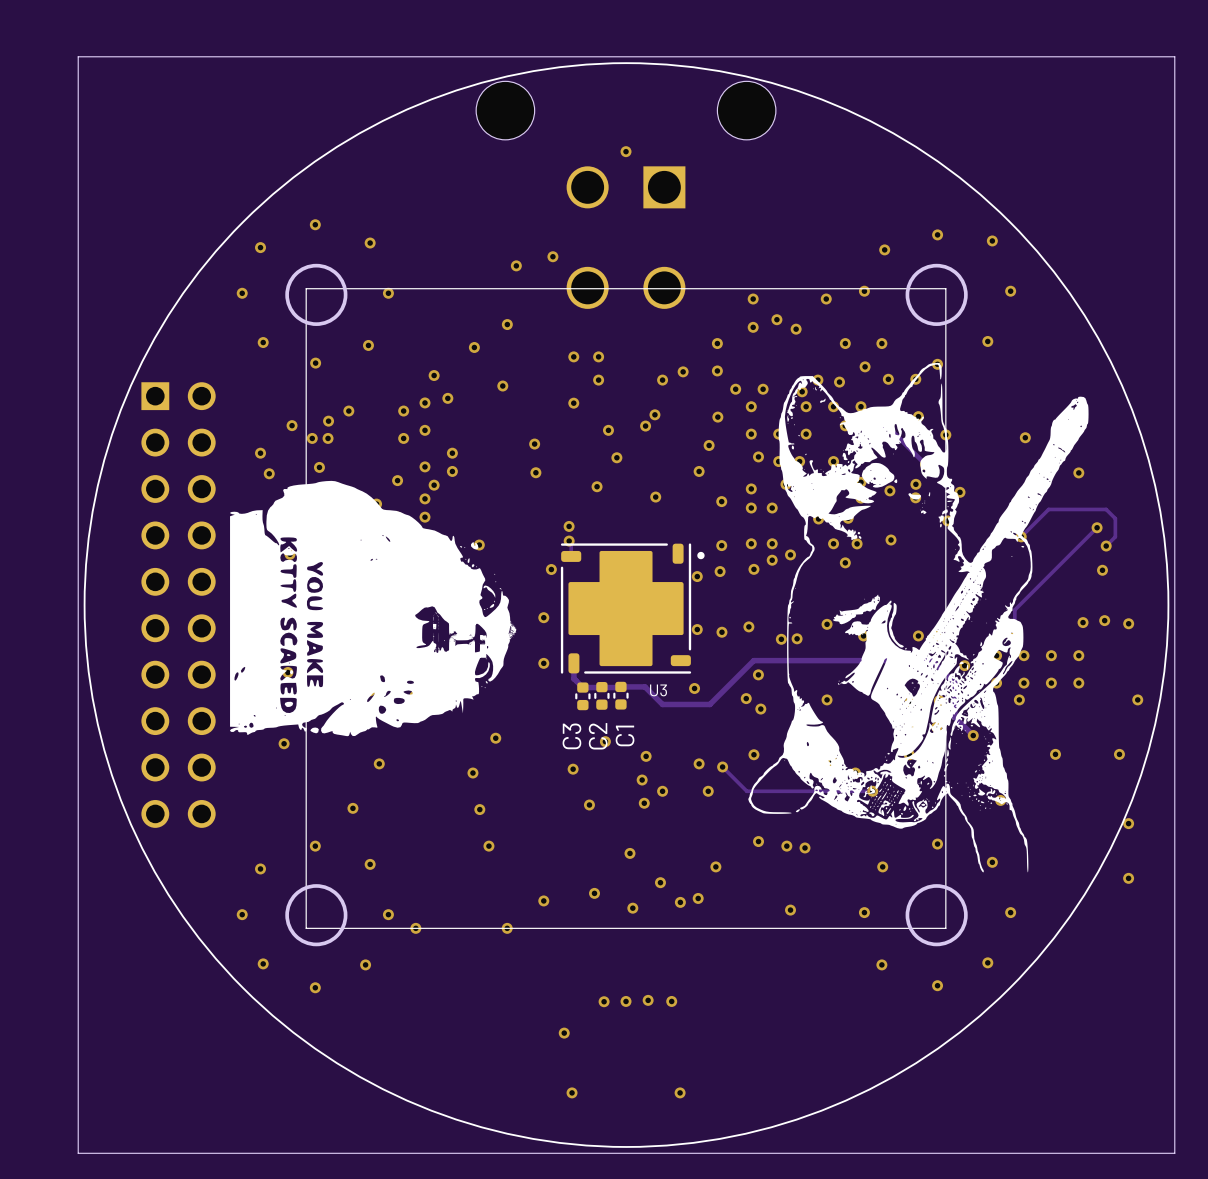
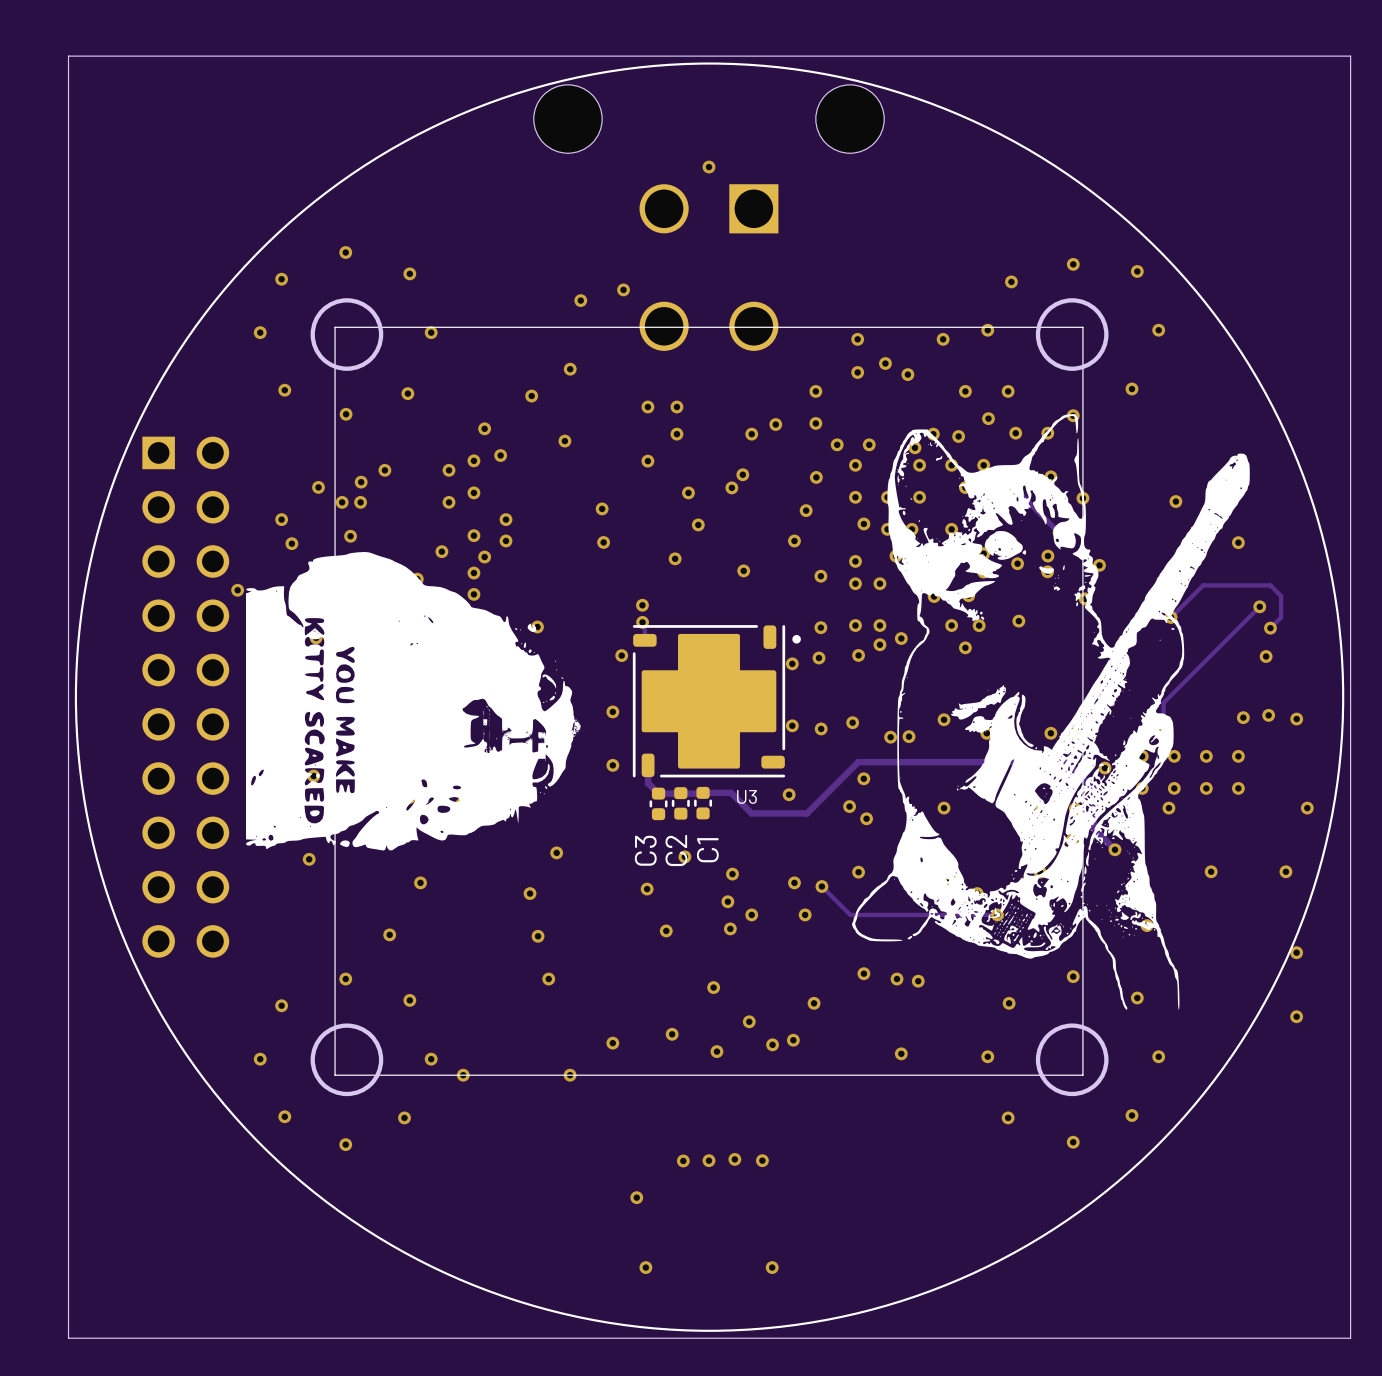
via: none -> (237, 590)

